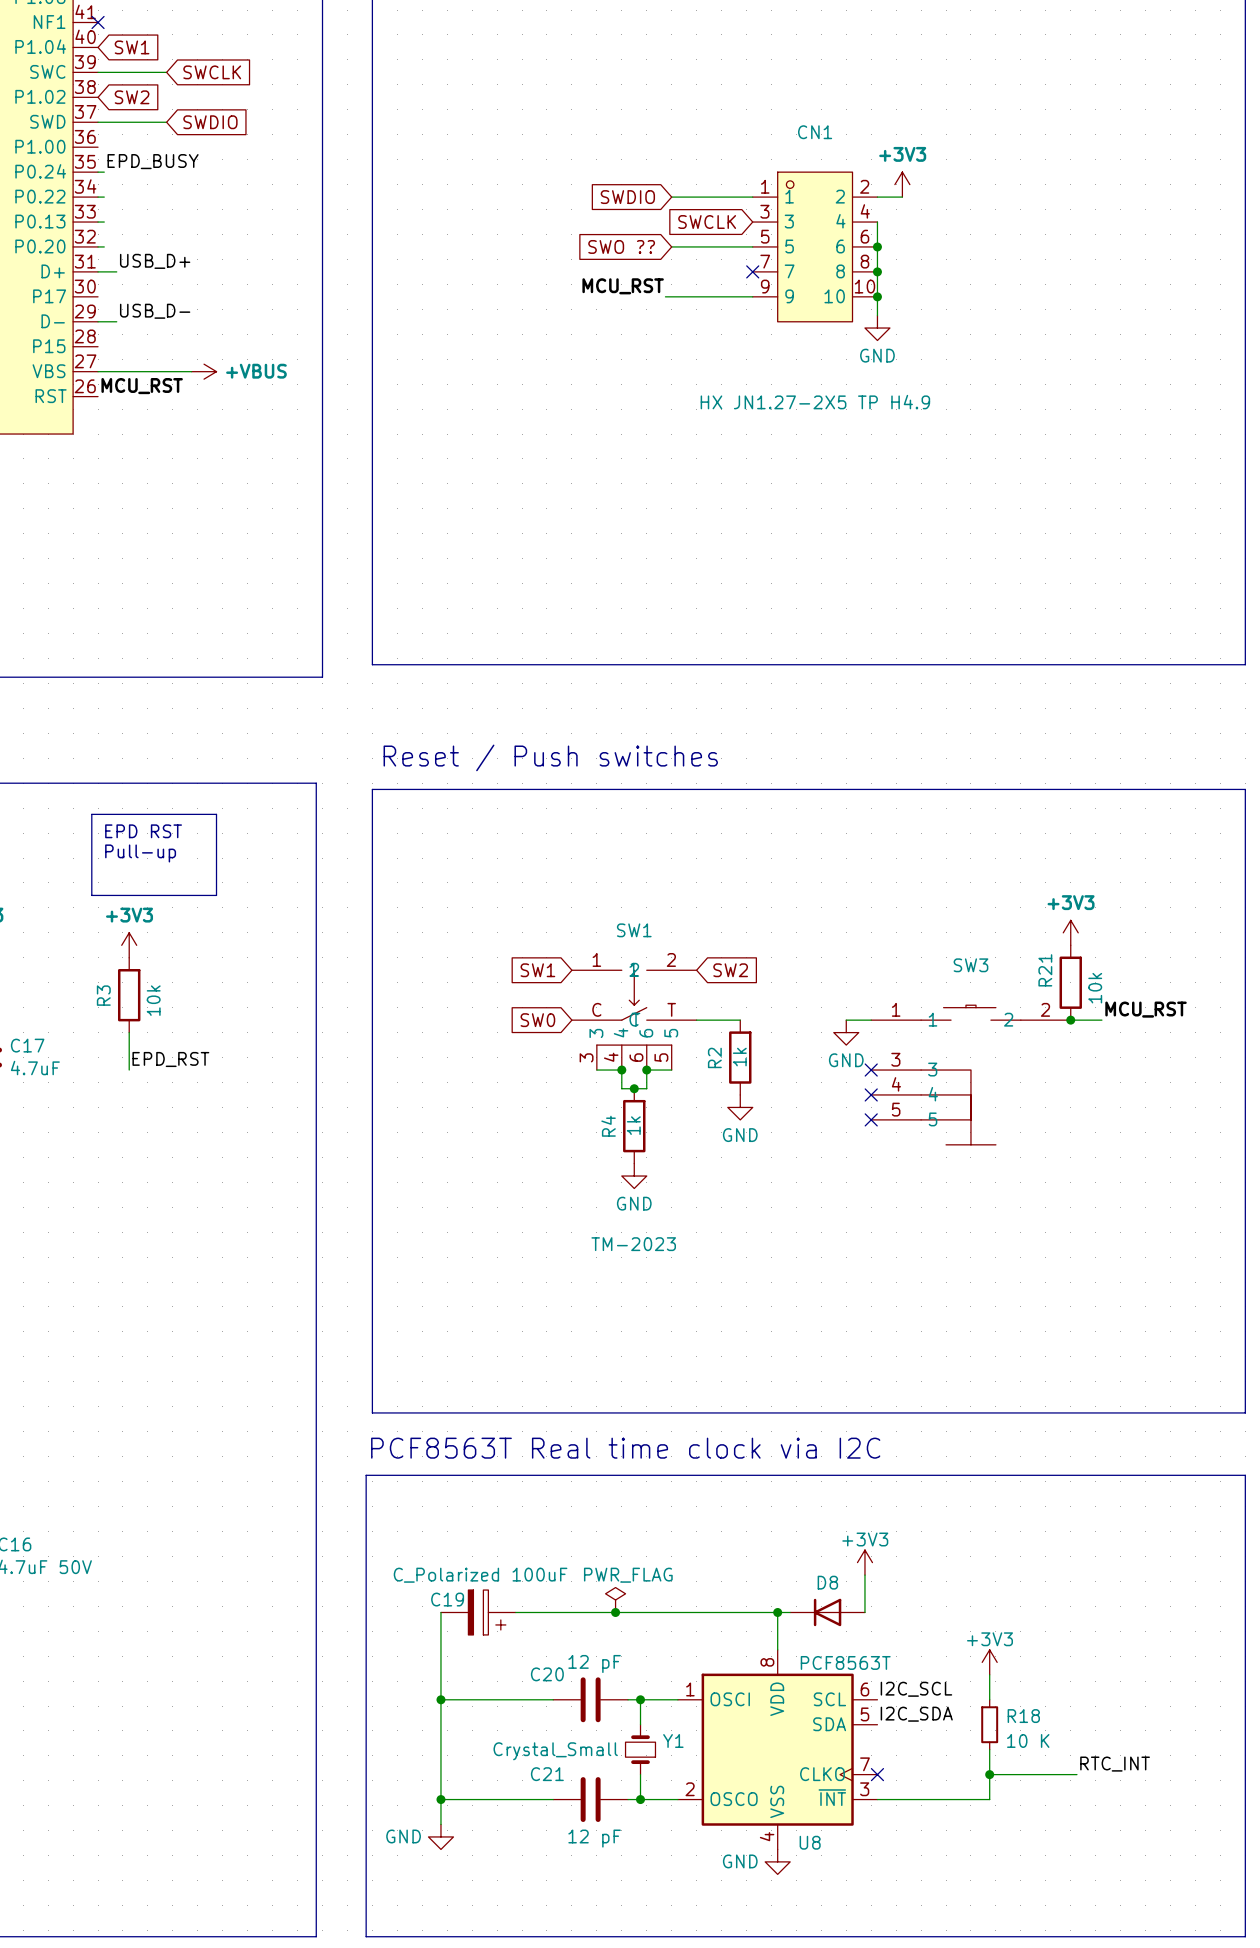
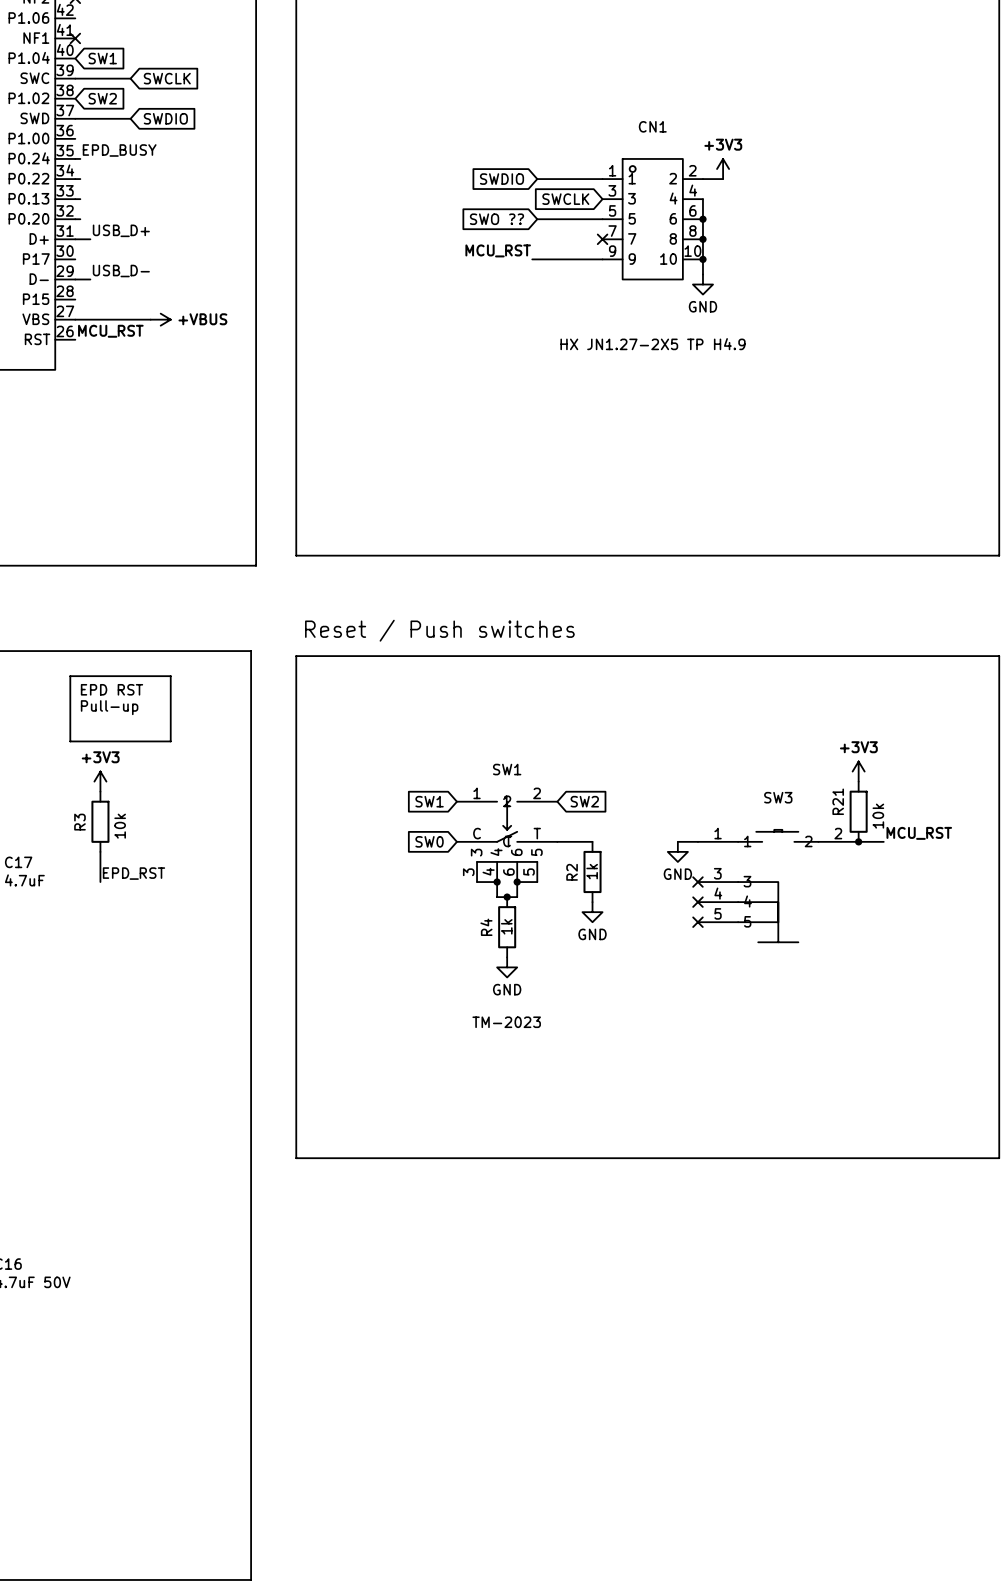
text: PCF8563T Real time clock via I2C (625, 1448) -> none
line: (366, 1475) (366, 1936) (1245, 1936) (1245, 1475) (366, 1475) -> none
power symbol: +3V3 (864, 1562) -> none
wire: (864, 1575) (864, 1612) -> none
power symbol: PWR_FLAG (615, 1600) -> none
wire: (440, 1612) (440, 1799) -> none
C19: C_Polarized 100uF (478, 1612) -> none
wire: (515, 1612) (790, 1612) -> none
junction: (615, 1612) -> none
wire: (777, 1612) (777, 1649) -> none
junction: (777, 1612) -> none
D8: (827, 1612) -> none
power symbol: +3V3 (989, 1662) -> none
wire: (989, 1674) (989, 1699) -> none
label: I2C_SCL (916, 1689) -> none
wire: (440, 1699) (553, 1699) -> none
junction: (440, 1699) -> none
C20: 12 pF (590, 1699) -> none
wire: (628, 1699) (677, 1699) -> none
wire: (640, 1699) (640, 1724) -> none
junction: (640, 1699) -> none
label: I2C_SDA (916, 1714) -> none
R18: 10 K (989, 1724) -> none
Y1: Crystal_Small (640, 1749) -> none
U8: PCF8563T (777, 1749) -> none
wire: (989, 1749) (989, 1799) (877, 1799) -> none
label: RTC_INT (1115, 1764) -> none
wire: (640, 1774) (640, 1799) -> none
no-connect mark: (877, 1774) -> none
wire: (989, 1774) (1076, 1774) -> none
junction: (989, 1774) -> none
wire: (440, 1799) (553, 1799) -> none
wire: (440, 1799) (440, 1824) -> none
junction: (440, 1799) -> none
C21: 12 pF (590, 1799) -> none
wire: (628, 1799) (677, 1799) -> none
junction: (640, 1799) -> none
power symbol: GND (440, 1836) -> none
power symbol: GND (777, 1861) -> none

